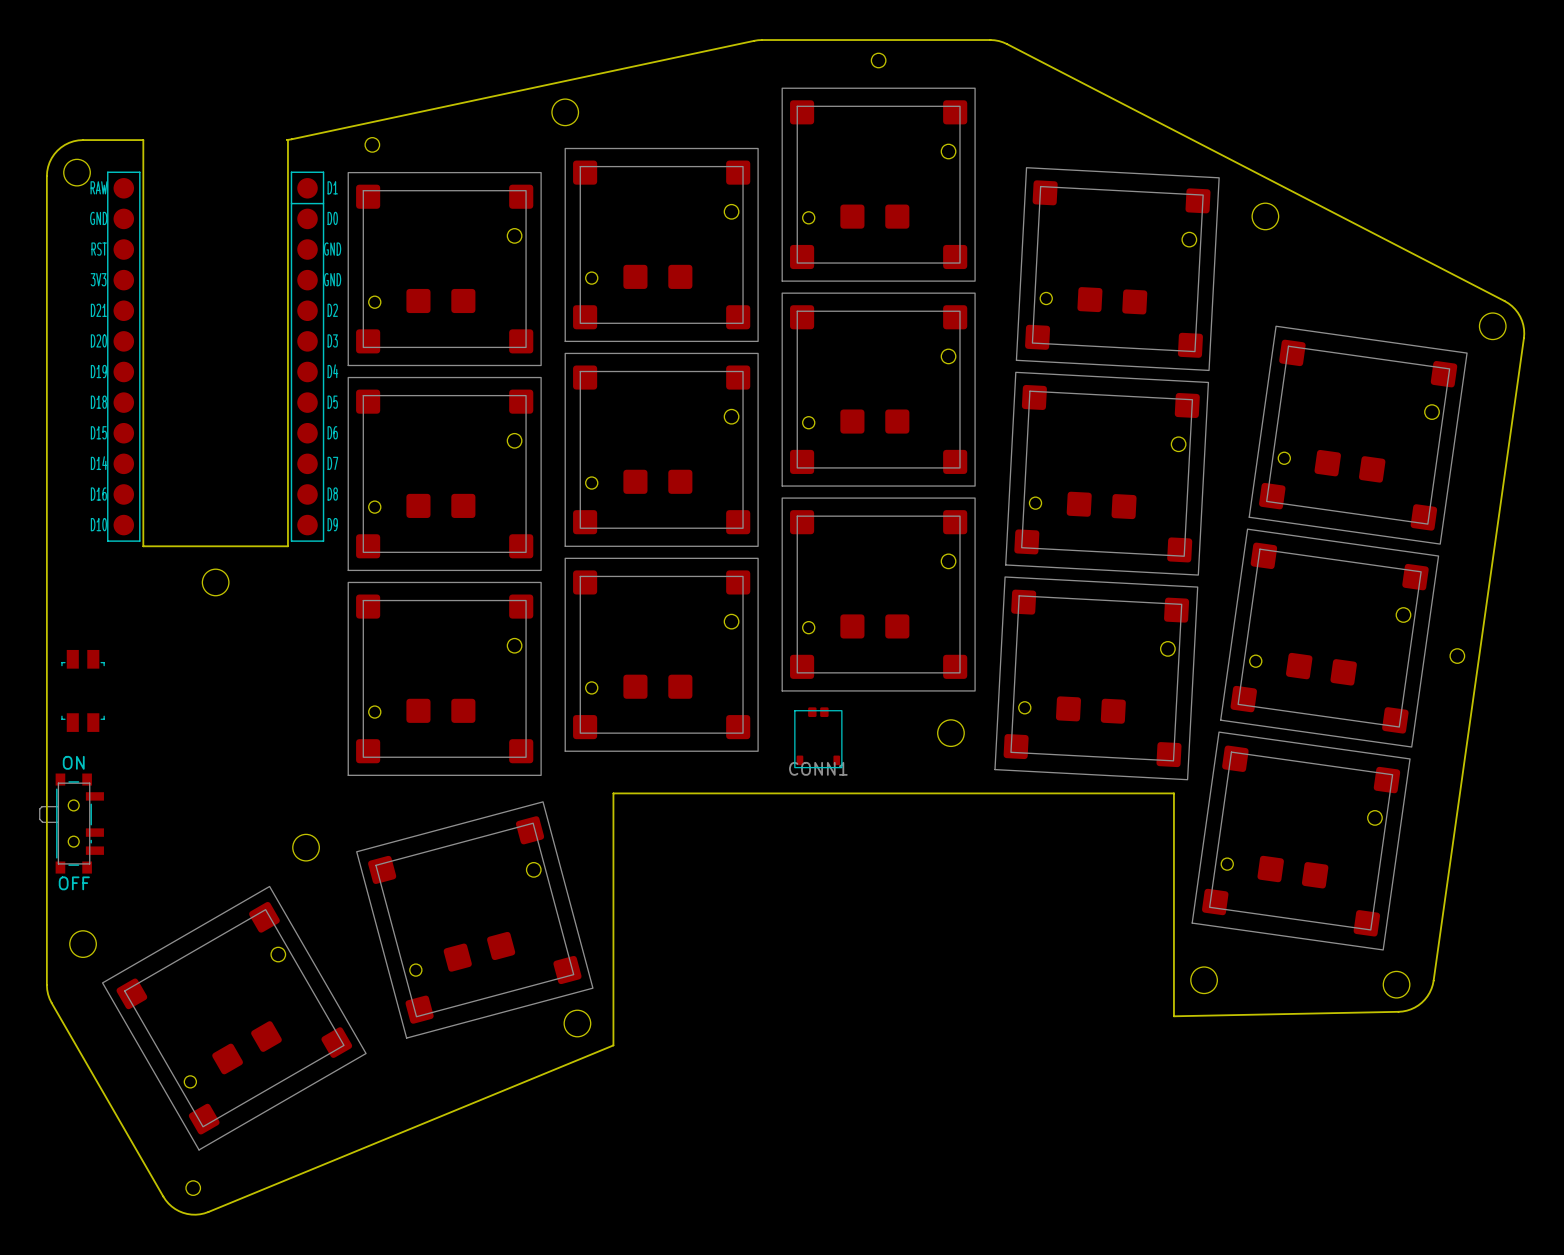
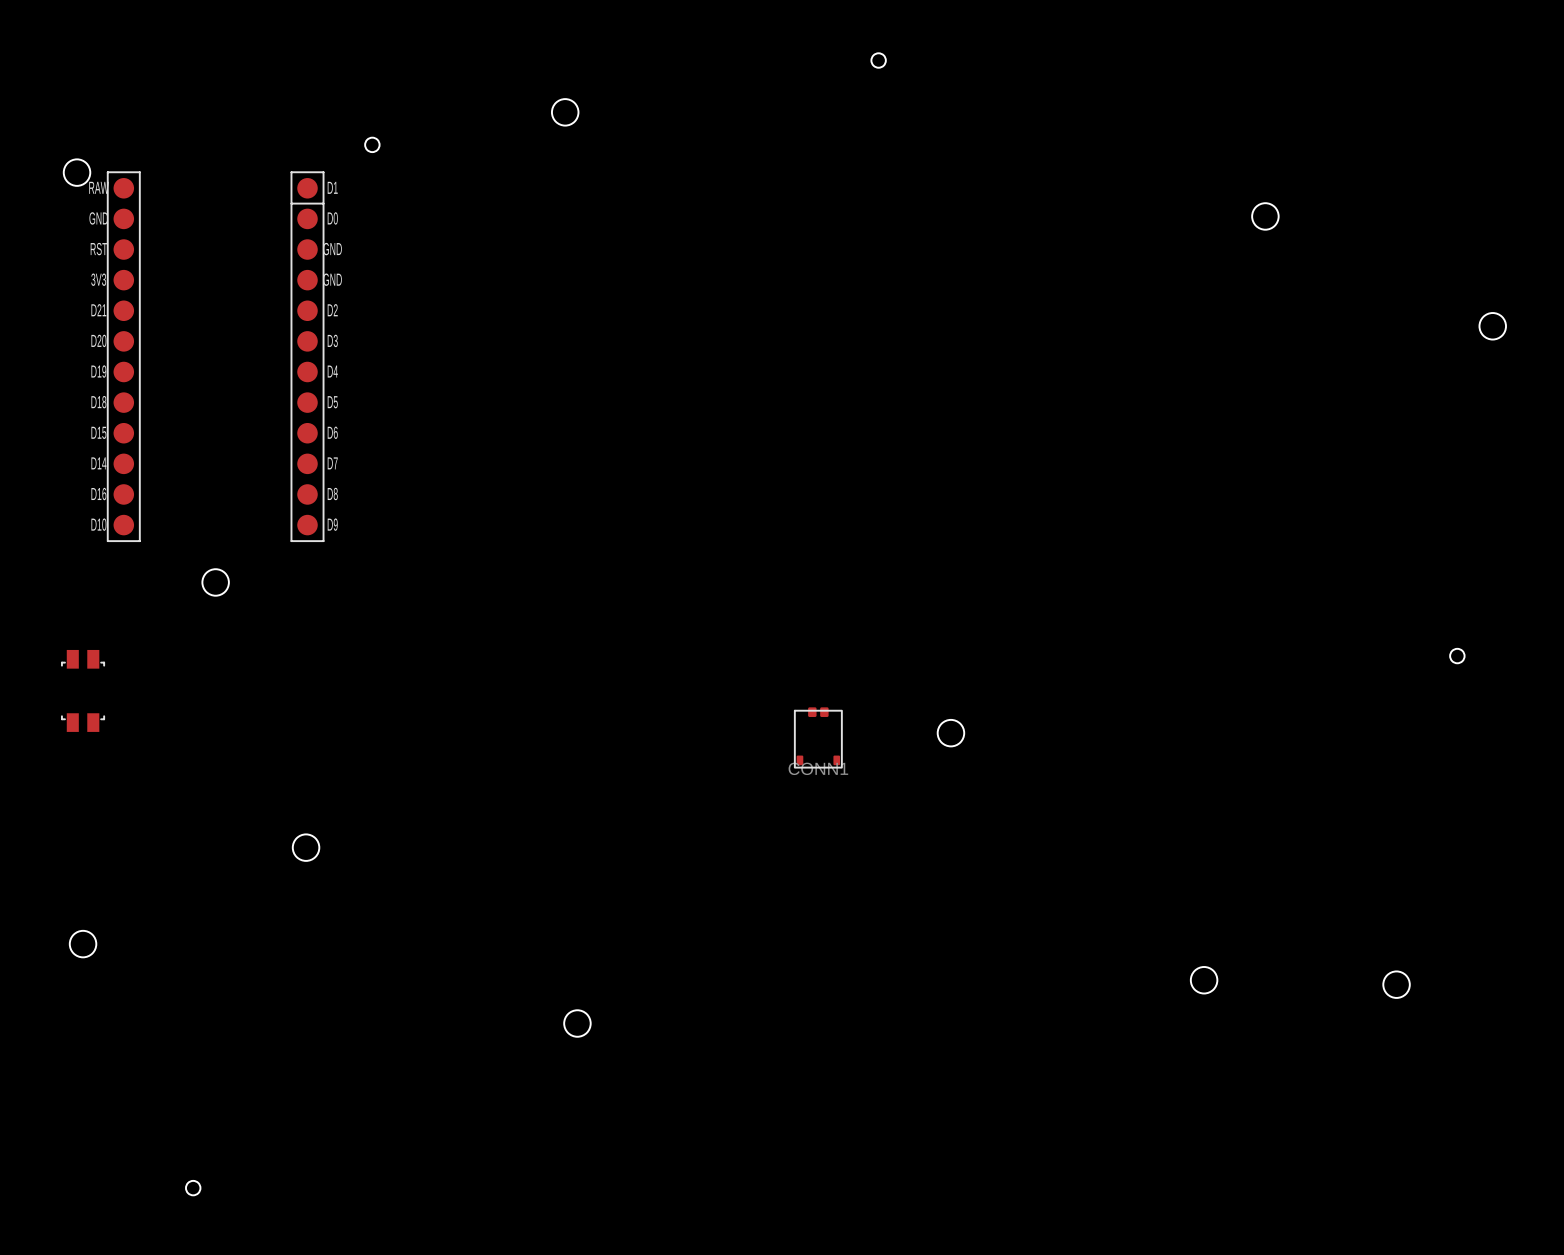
board edge: (761, 40) (990, 40) (1003, 42) (1504, 301) (1517, 312) (1523, 325) (1523, 338) (1433, 980) (1429, 992) (1418, 1005) (1402, 1011) (1173, 1016) (1173, 793) (613, 793) (613, 1045) (208, 1212) (191, 1214) (179, 1211) (168, 1203) (163, 1196) (51, 1003) (47, 989) (46, 176) (51, 158) (61, 147) (78, 140) (143, 140) (143, 546) (287, 546) (287, 139) (761, 40) -> none
part: (878, 184) -> none
part: (661, 244) -> none
part: (444, 269) -> none
part: (1117, 269) -> none
part: (878, 389) -> none
part: (1358, 435) -> none
part: (661, 449) -> none
part: (444, 473) -> none
part: (1107, 473) -> none
part: (878, 594) -> none
part: (1329, 638) -> none
part: (661, 654) -> none
part: (444, 678) -> none
part: (1096, 678) -> none
part: (71, 823) -> none
part: (1301, 841) -> none
part: (474, 919) -> none
part: (234, 1018) -> none

